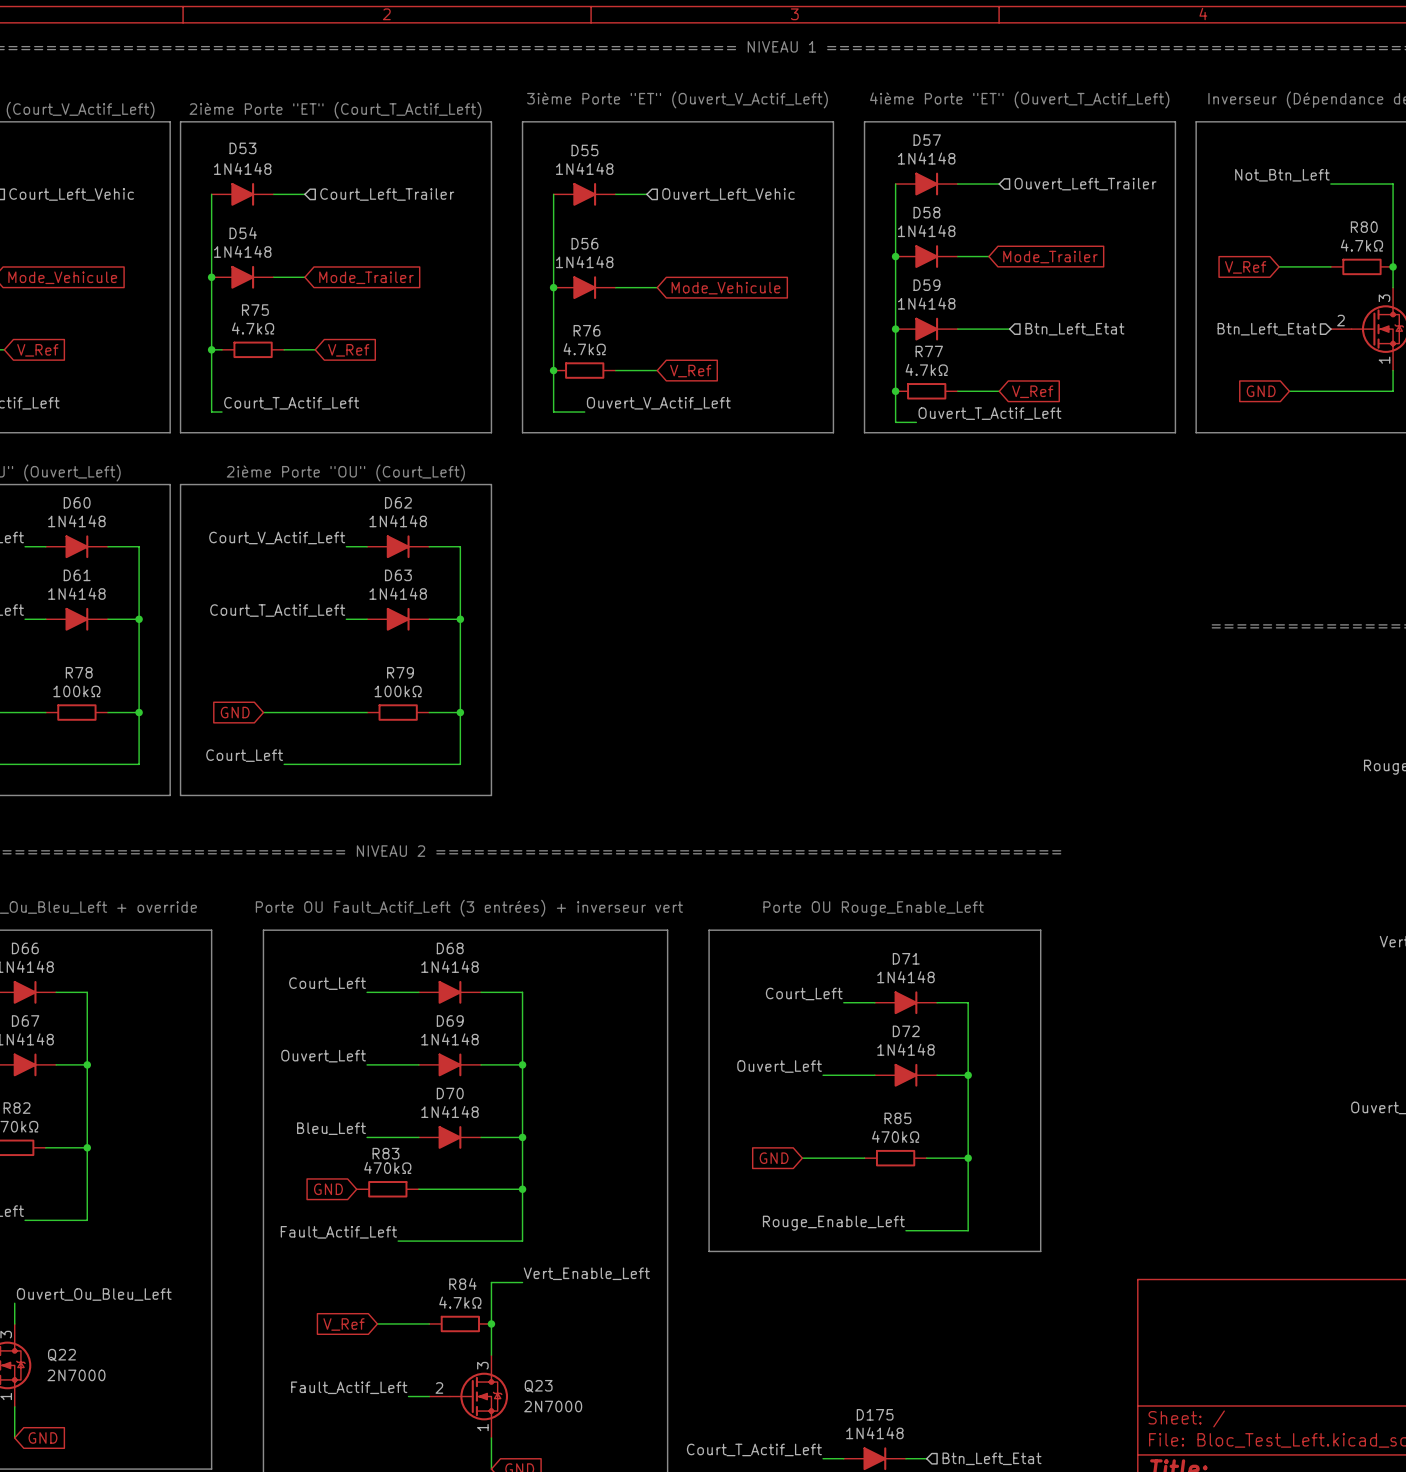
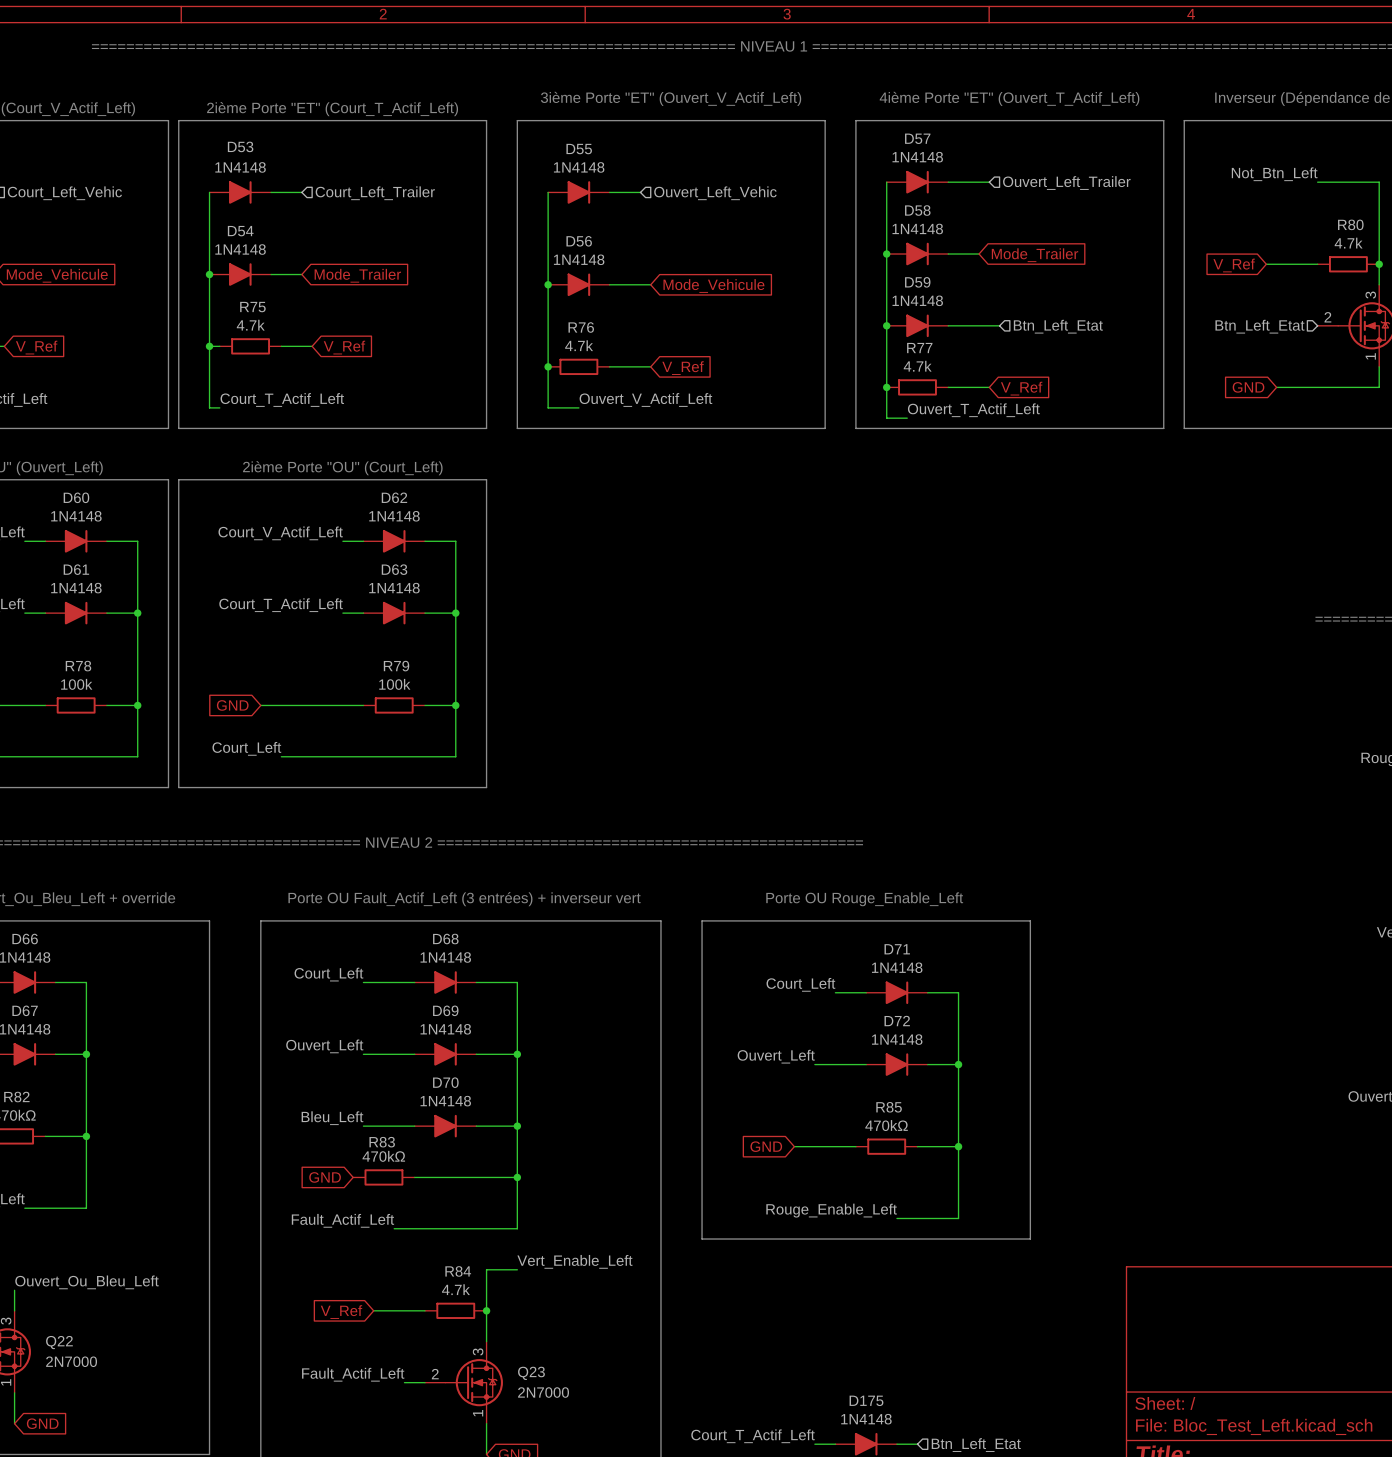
R80 value: 4.7kΩ (1361, 245) -> 4.7k (1348, 243)
R75 value: 4.7kΩ (253, 328) -> 4.7k (250, 325)
R76 value: 4.7kΩ (584, 349) -> 4.7k (579, 345)
R77 value: 4.7kΩ (926, 369) -> 4.7k (917, 366)
R78 value: 100kΩ (76, 691) -> 100k (76, 684)
R79 value: 100kΩ (398, 691) -> 100k (394, 684)
R84 value: 4.7kΩ (460, 1302) -> 4.7k (455, 1289)

